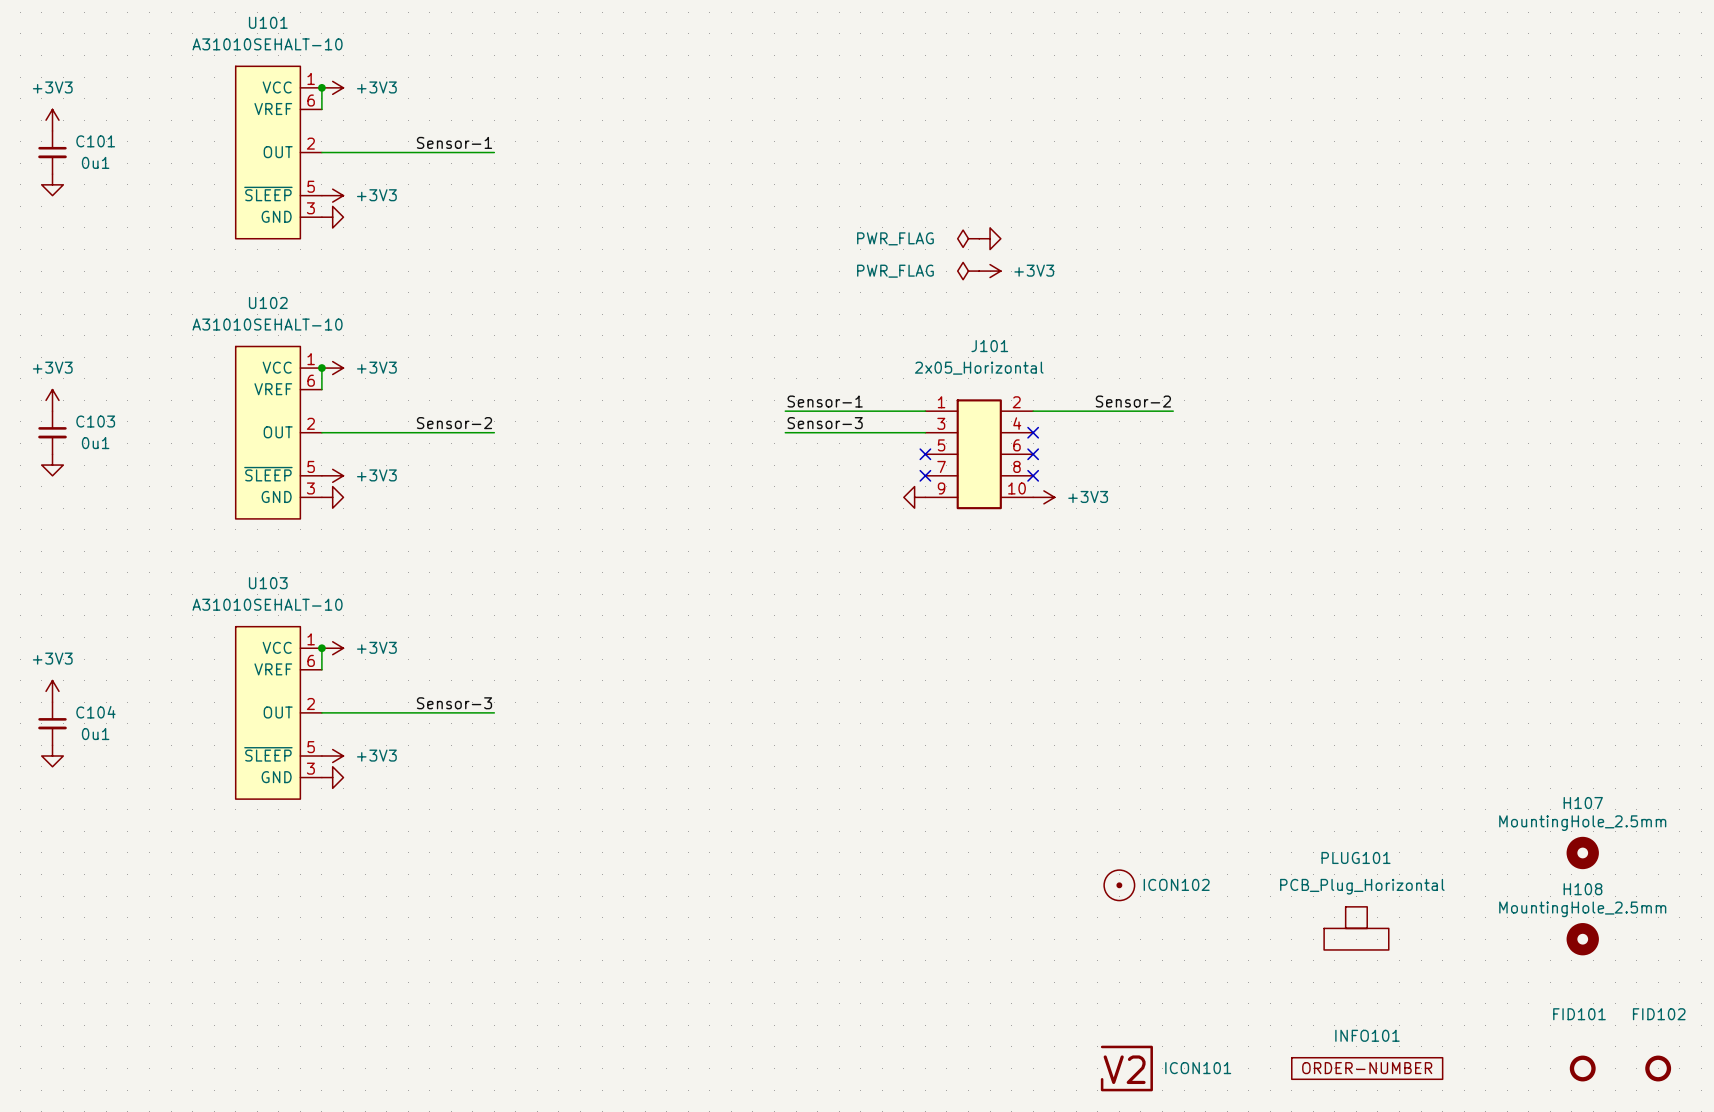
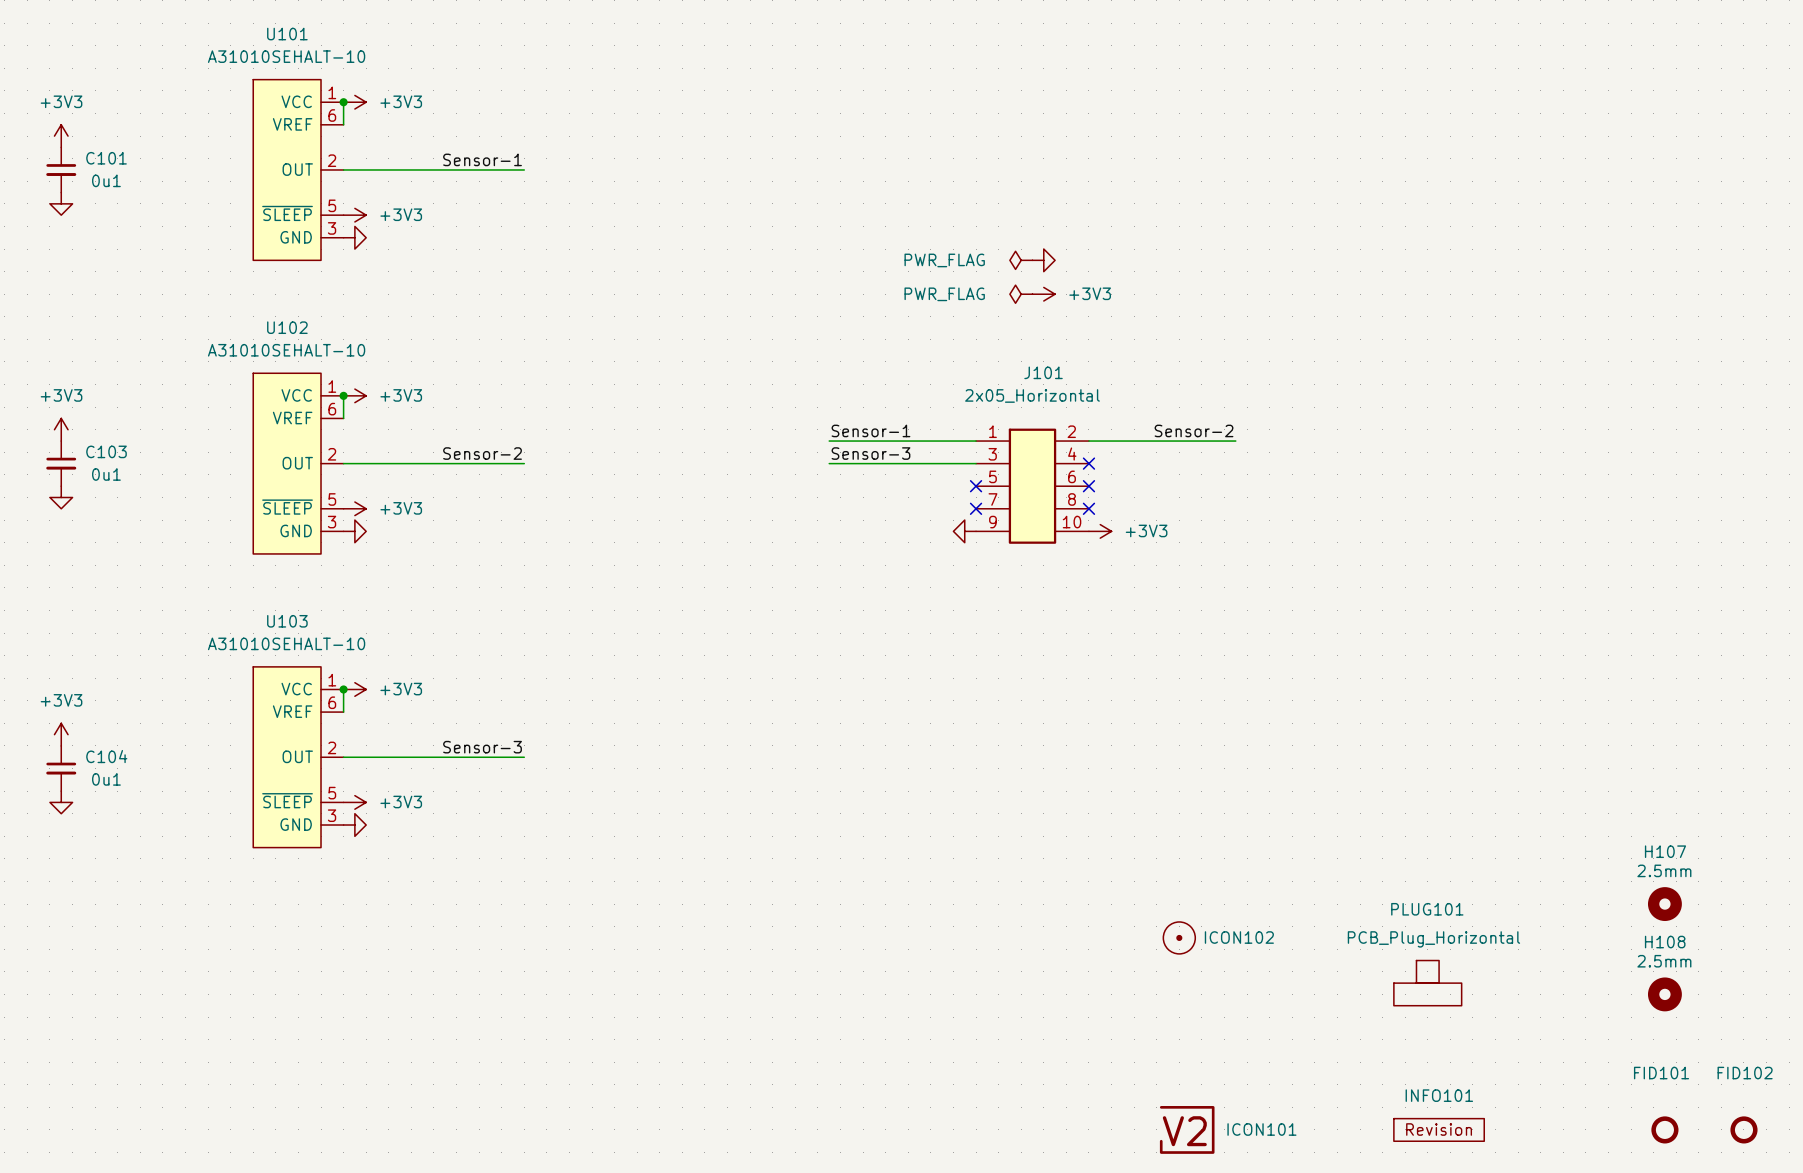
H107 value: MountingHole_2.5mm (1582, 823) -> 2.5mm (1664, 870)
H108 value: MountingHole_2.5mm (1582, 909) -> 2.5mm (1664, 961)
INFO101 symbol: [1291, 1057, 1443, 1080] -> [1393, 1118, 1485, 1142]

